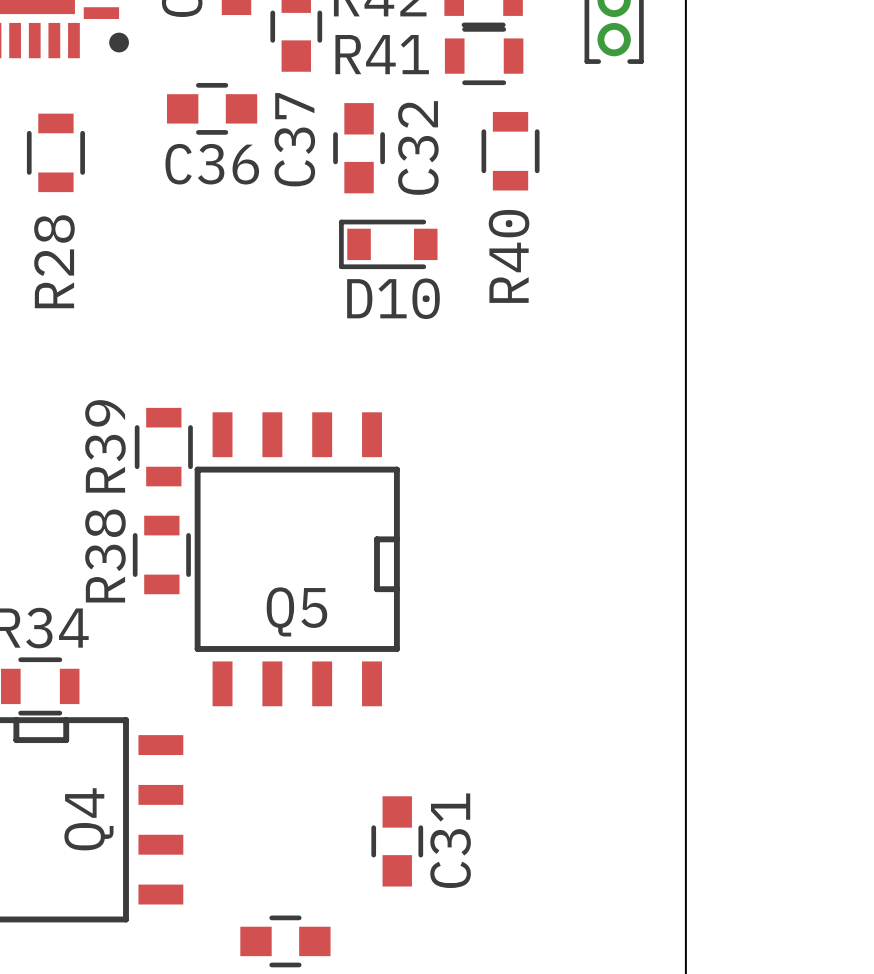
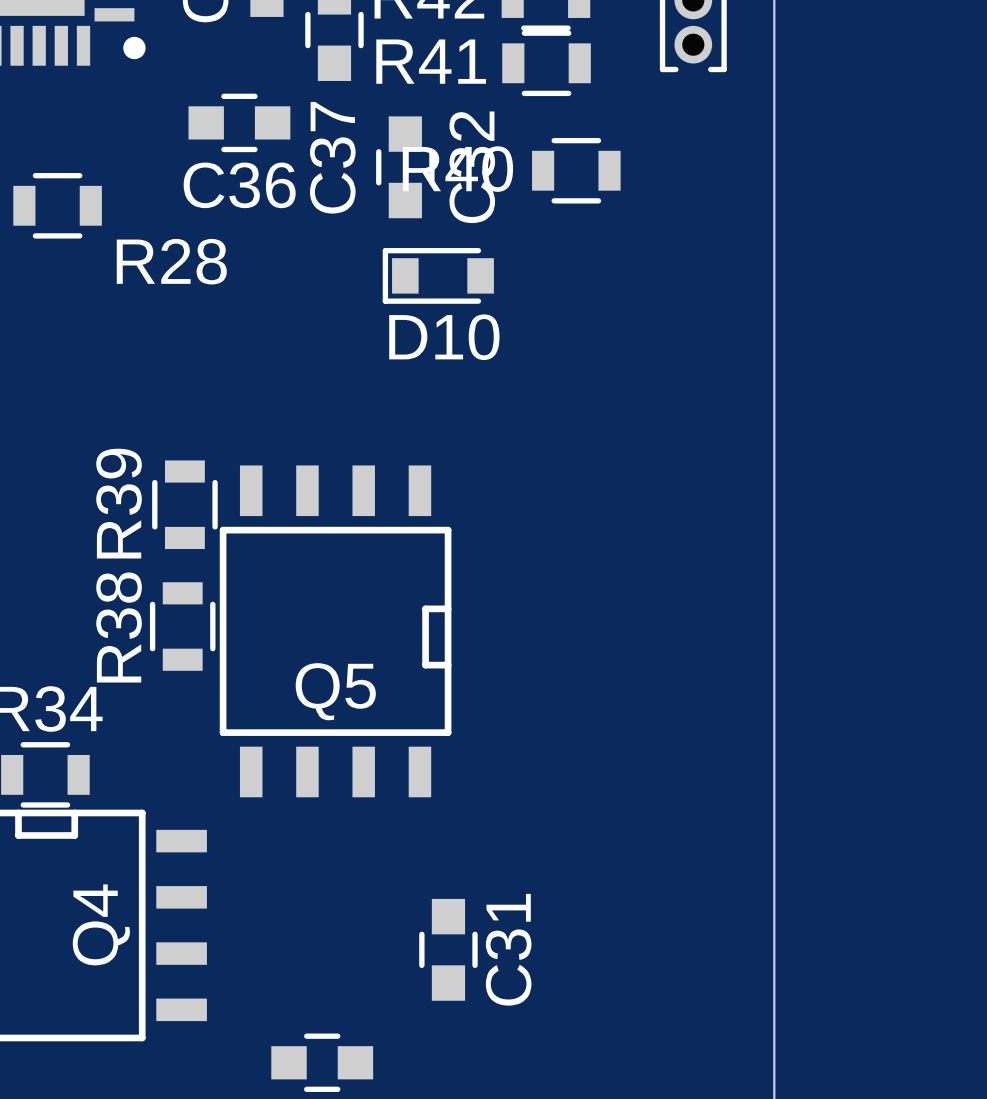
R40 rotation: 0° (510, 151) -> 90° clockwise (576, 170)
R28 rotation: 0° (55, 152) -> 90° clockwise (57, 205)
R28 name position: R28 (54, 261) -> R28 (171, 261)

